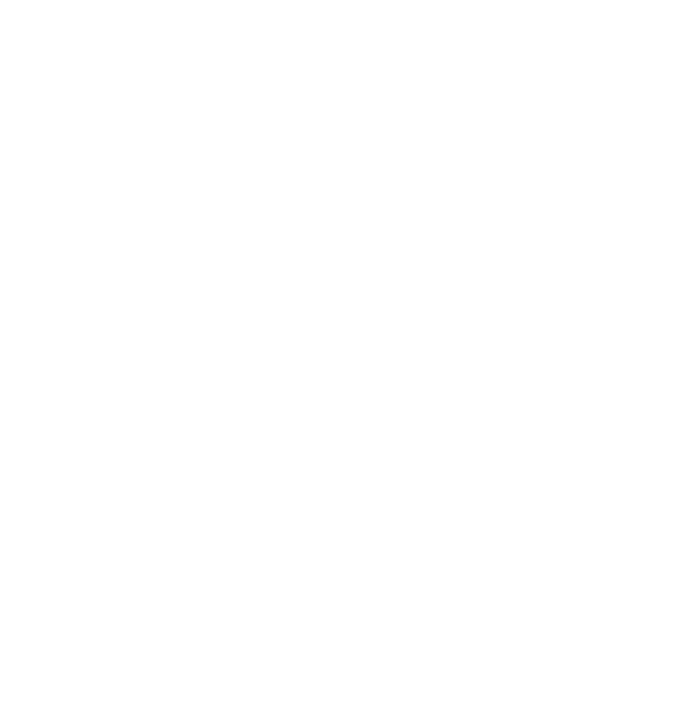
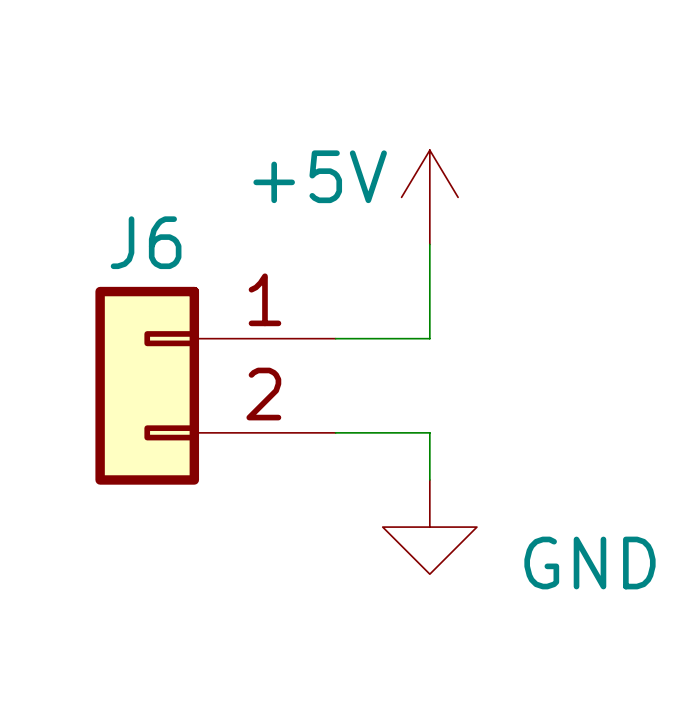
power symbol: none -> +5V (429, 197)
wire: none -> (429, 244) (429, 338) (335, 338)
J6: none -> (215, 385)
wire: none -> (335, 432) (429, 432) (429, 479)
power symbol: none -> GND (429, 527)

